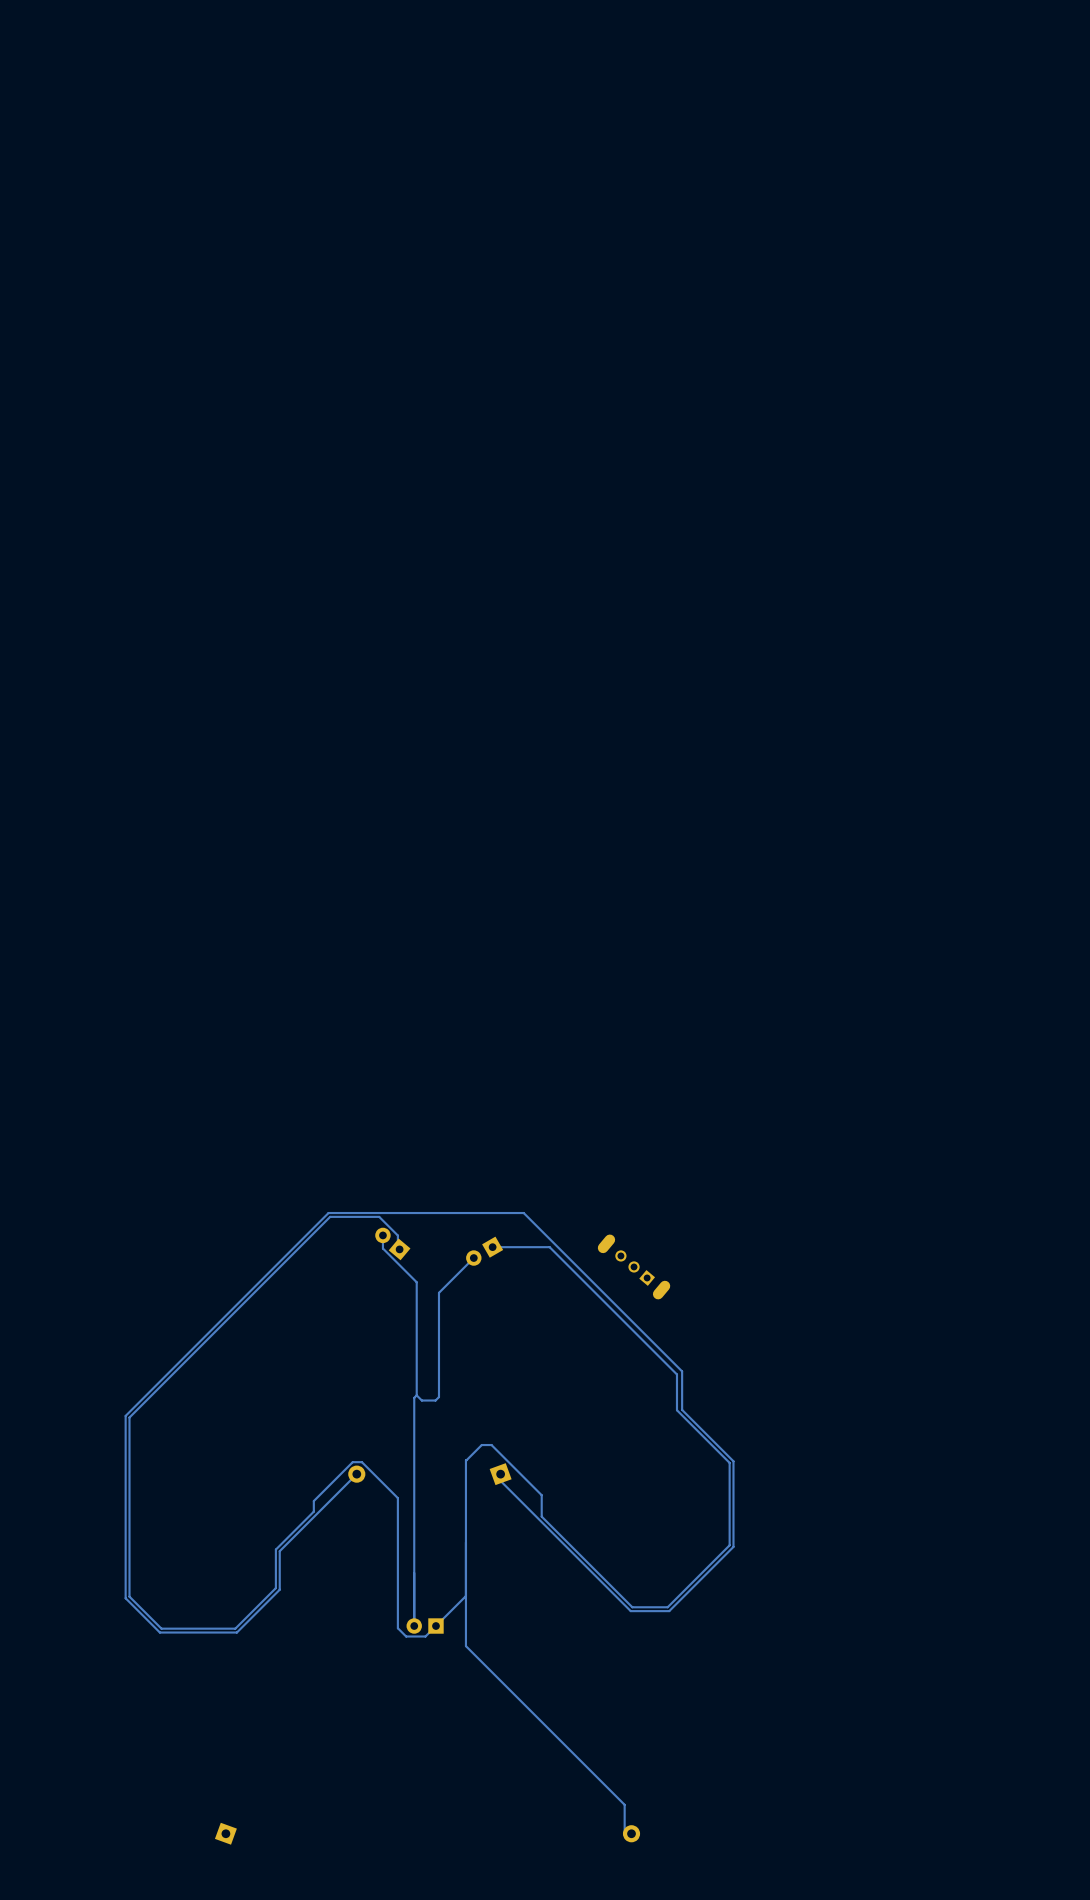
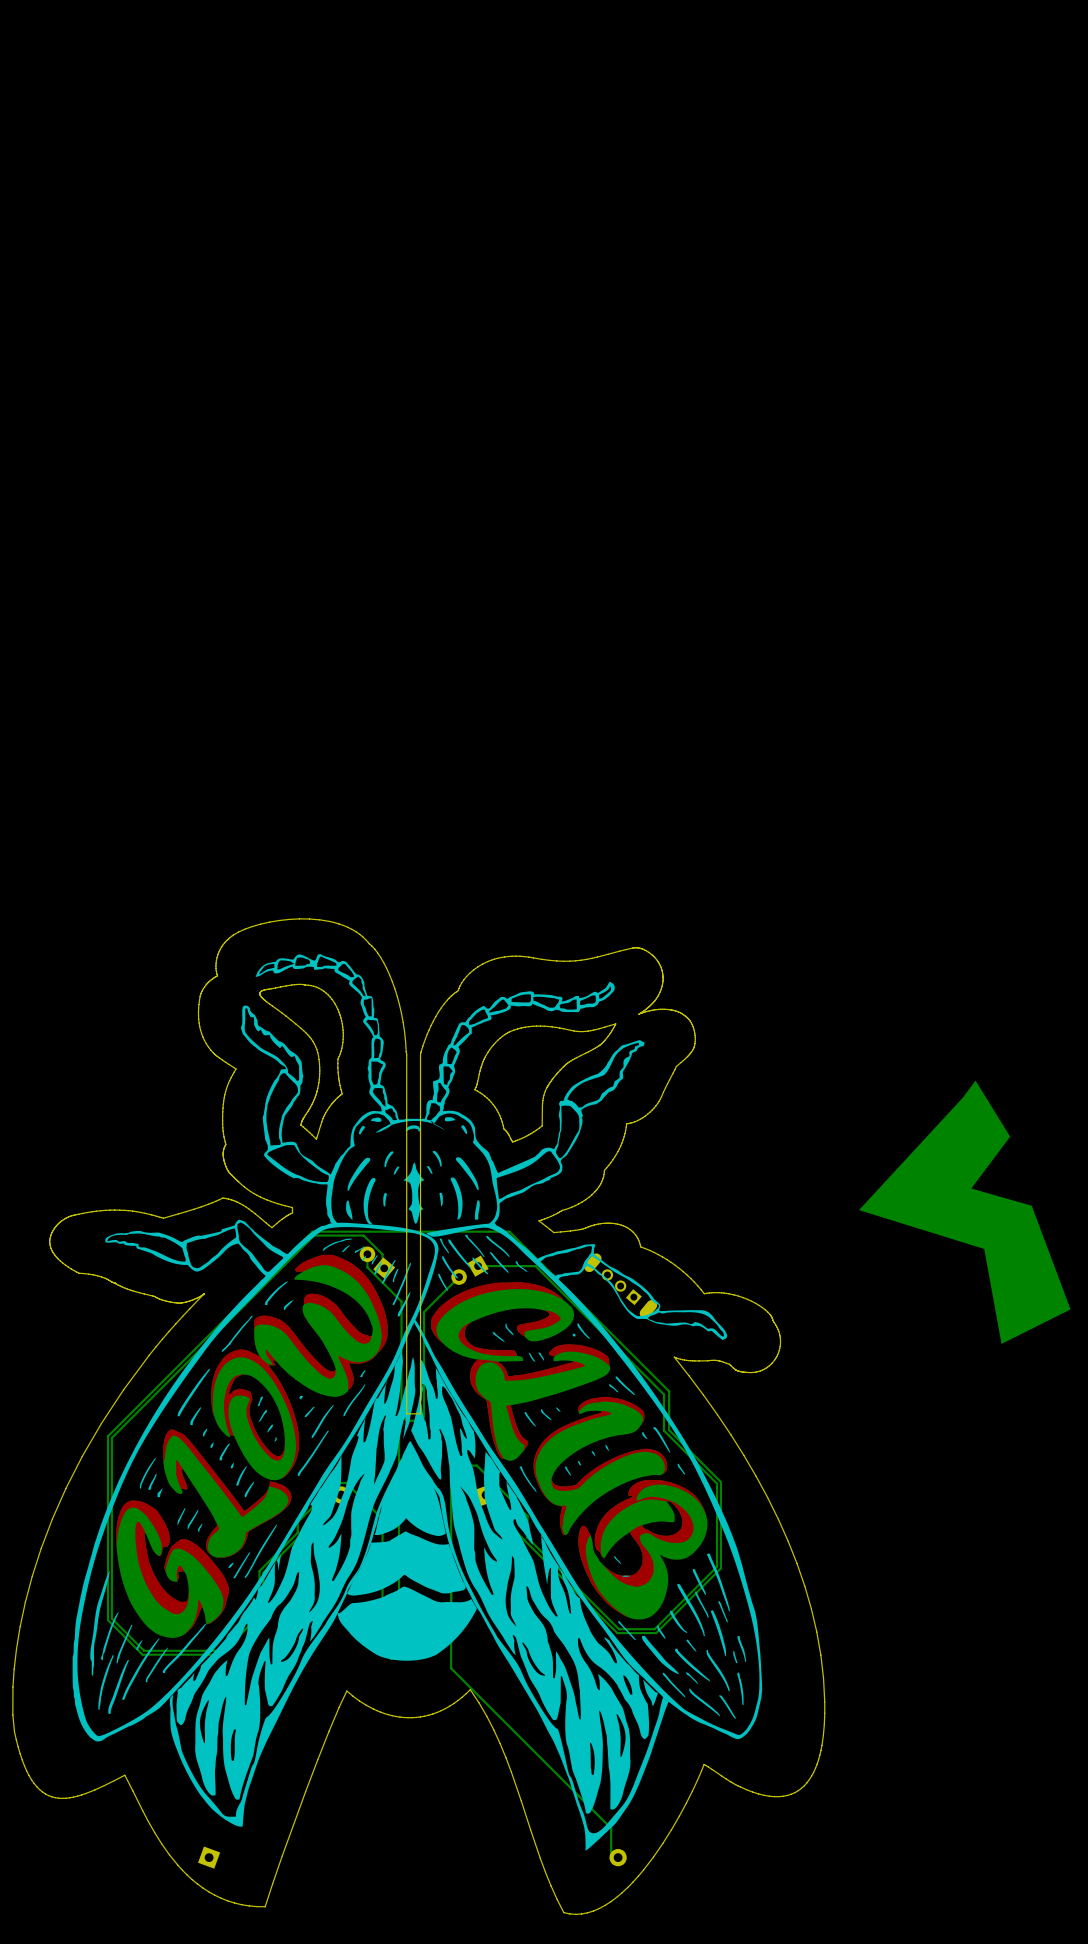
drawing: none -> [72, 954, 763, 1851]
board edge: none -> (299, 984) (264, 989) (259, 994) (264, 999) (303, 1030) (315, 1046) (319, 1063) (318, 1085) (313, 1101) (300, 1125) (316, 1139) (325, 1113) (342, 1093) (337, 1063) (342, 1042) (342, 1027) (337, 1009) (328, 994) (316, 987) (299, 984)
board edge: none -> (615, 1023) (582, 1031) (548, 1026) (525, 1027) (507, 1032) (493, 1044) (483, 1061) (474, 1089) (487, 1098) (495, 1107) (503, 1129) (512, 1142) (542, 1125) (543, 1098) (551, 1080) (567, 1063) (600, 1044) (615, 1023)
drawing: none -> [859, 1080, 1071, 1344]
part footprint: [597, 1234, 671, 1300] -> [584, 1253, 658, 1319]
board edge: none -> (114, 1283) (99, 1276) (78, 1273) (56, 1257) (51, 1249) (49, 1240) (52, 1231) (59, 1223) (71, 1215) (105, 1210) (132, 1211) (163, 1218) (222, 1198) (243, 1205) (271, 1227) (292, 1212) (292, 1207) (267, 1200) (250, 1191) (234, 1178) (226, 1168) (223, 1155) (225, 1144) (222, 1127) (223, 1104) (227, 1086) (236, 1068) (214, 1053) (204, 1040) (198, 1019) (200, 996) (205, 985) (217, 975) (216, 960) (221, 947) (228, 938) (238, 932) (269, 922) (299, 918) (329, 921) (347, 927) (363, 937) (374, 949) (383, 962) (394, 988) (403, 1022) (406, 1054) (406, 1413) (420, 1413) (420, 1054) (431, 1025) (441, 1007) (458, 990) (466, 976) (477, 966) (491, 960) (515, 956) (556, 960) (575, 960) (635, 947) (649, 952) (660, 965) (662, 983) (655, 999) (638, 1014) (662, 1009) (682, 1013) (689, 1020) (693, 1028) (695, 1039) (693, 1048) (676, 1066) (654, 1107) (640, 1119) (626, 1123) (620, 1145) (604, 1170) (601, 1182) (594, 1191) (578, 1203) (538, 1220) (553, 1232) (579, 1229) (604, 1223) (624, 1226) (635, 1235) (640, 1246) (675, 1265) (704, 1293) (726, 1293) (751, 1301) (767, 1312) (777, 1327) (780, 1340) (777, 1354) (769, 1365) (758, 1371) (738, 1371) (729, 1364) (718, 1360) (688, 1360) (674, 1357) (717, 1414) (756, 1476) (788, 1541) (804, 1586) (820, 1655) (824, 1702) (820, 1750) (815, 1768) (806, 1782) (798, 1790) (787, 1795) (764, 1795) (735, 1784) (704, 1764) (671, 1829) (638, 1876) (622, 1892) (605, 1905) (587, 1912) (575, 1914) (563, 1912) (557, 1899) (540, 1858) (500, 1743) (486, 1716) (470, 1689) (457, 1700) (441, 1710) (412, 1717) (396, 1716) (376, 1710) (346, 1691) (305, 1791) (265, 1906) (241, 1904) (221, 1898) (203, 1888) (187, 1875) (169, 1854) (154, 1832) (124, 1775) (94, 1789) (73, 1797) (55, 1797) (42, 1792) (31, 1779) (24, 1765) (16, 1739) (12, 1714) (14, 1669) (20, 1626) (41, 1548) (65, 1488) (101, 1423) (149, 1355) (204, 1293)
board edge: none -> (115, 1283) (130, 1290) (174, 1302) (186, 1301) (202, 1295)
board edge: none -> (203, 1293) (202, 1294)

